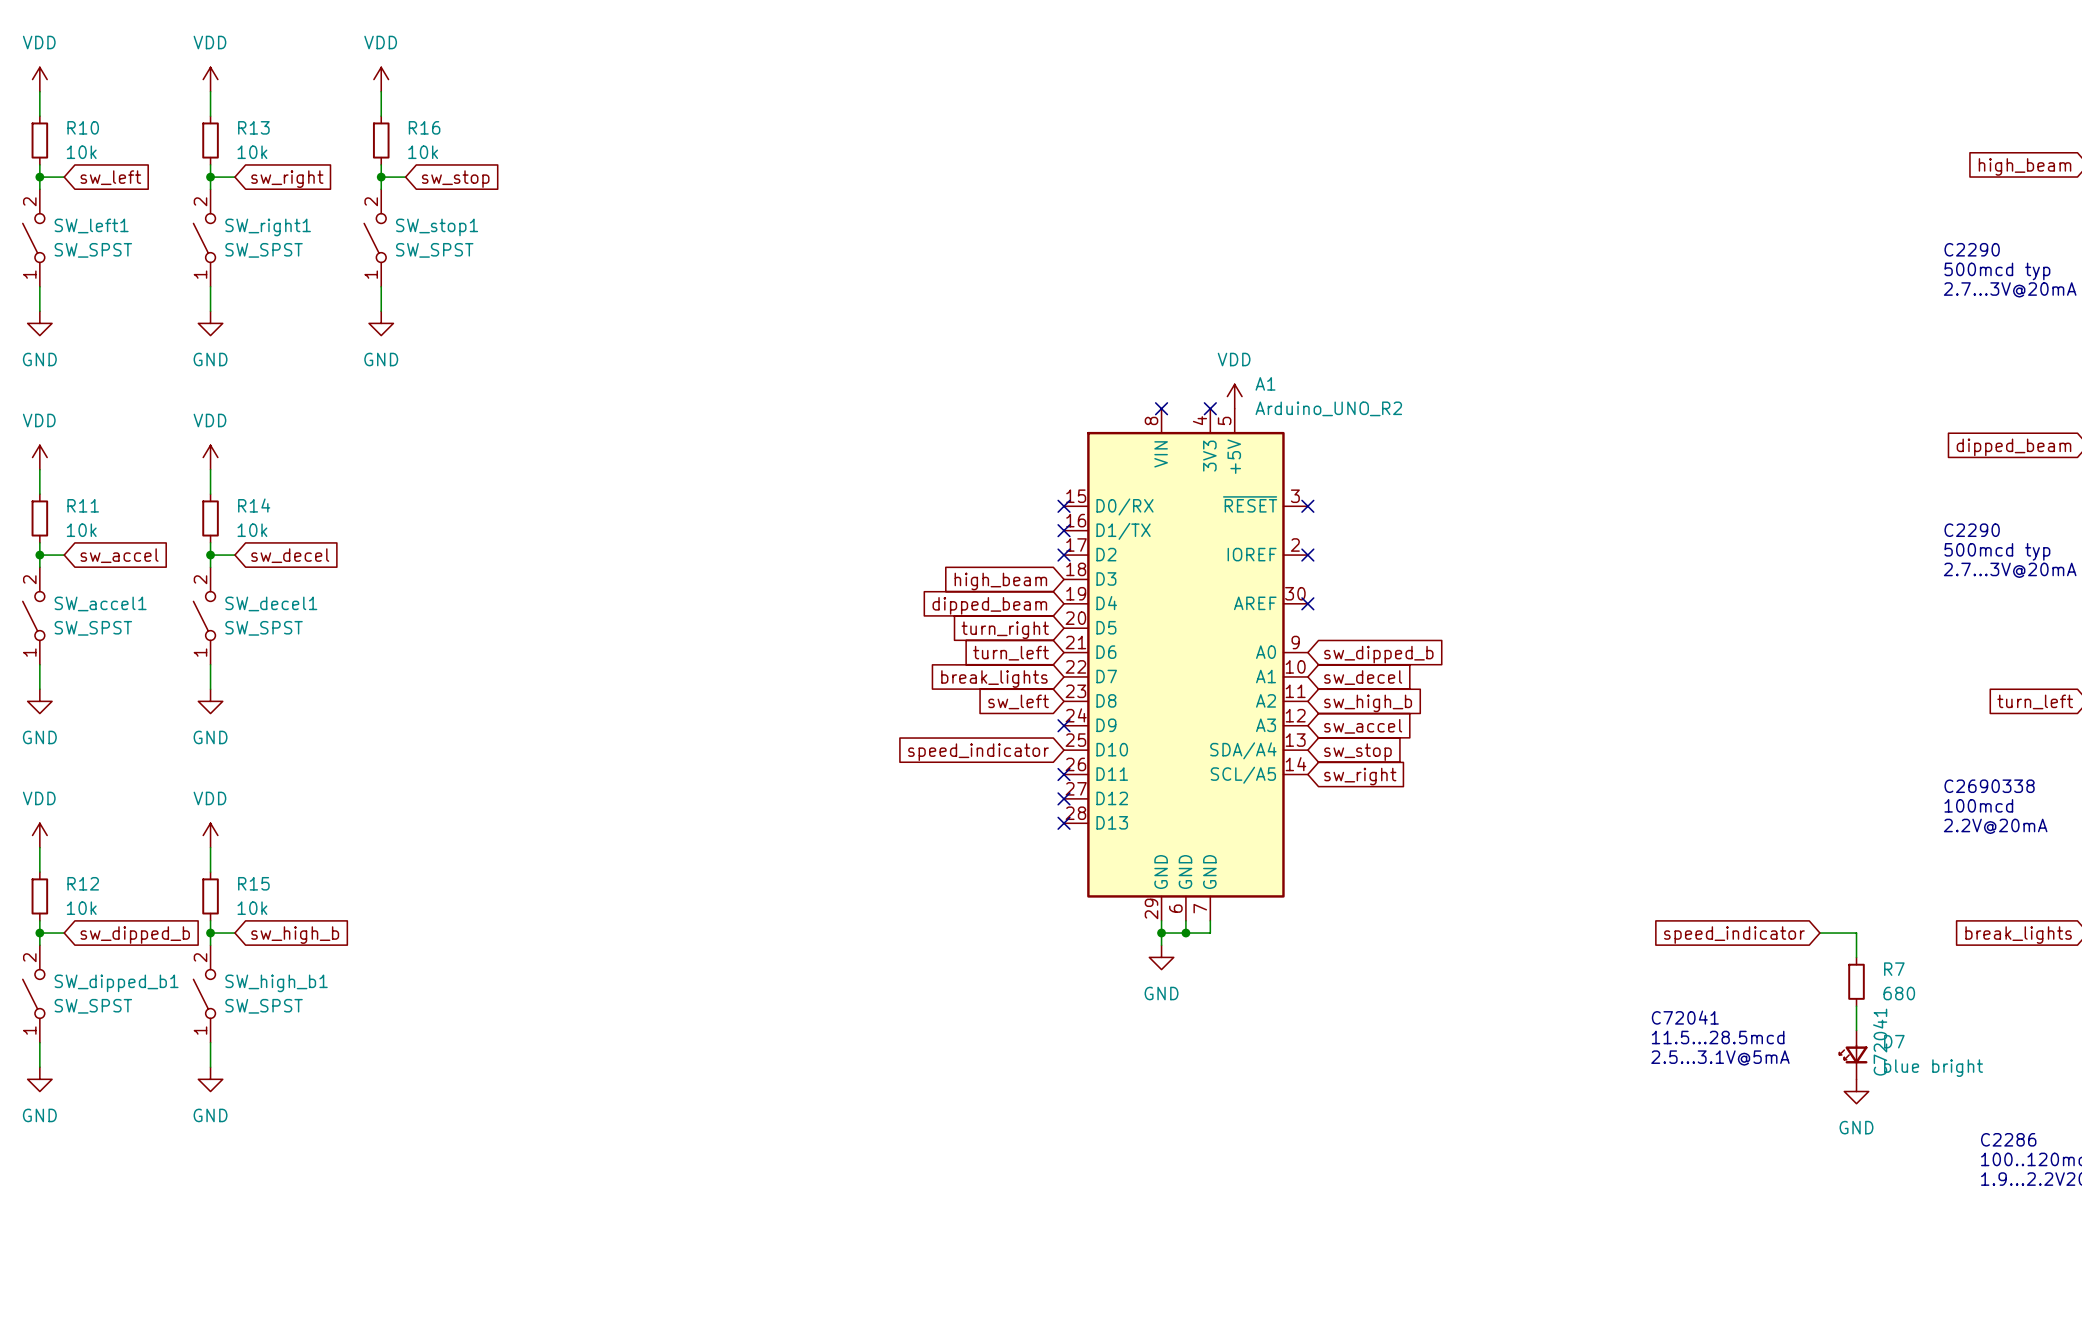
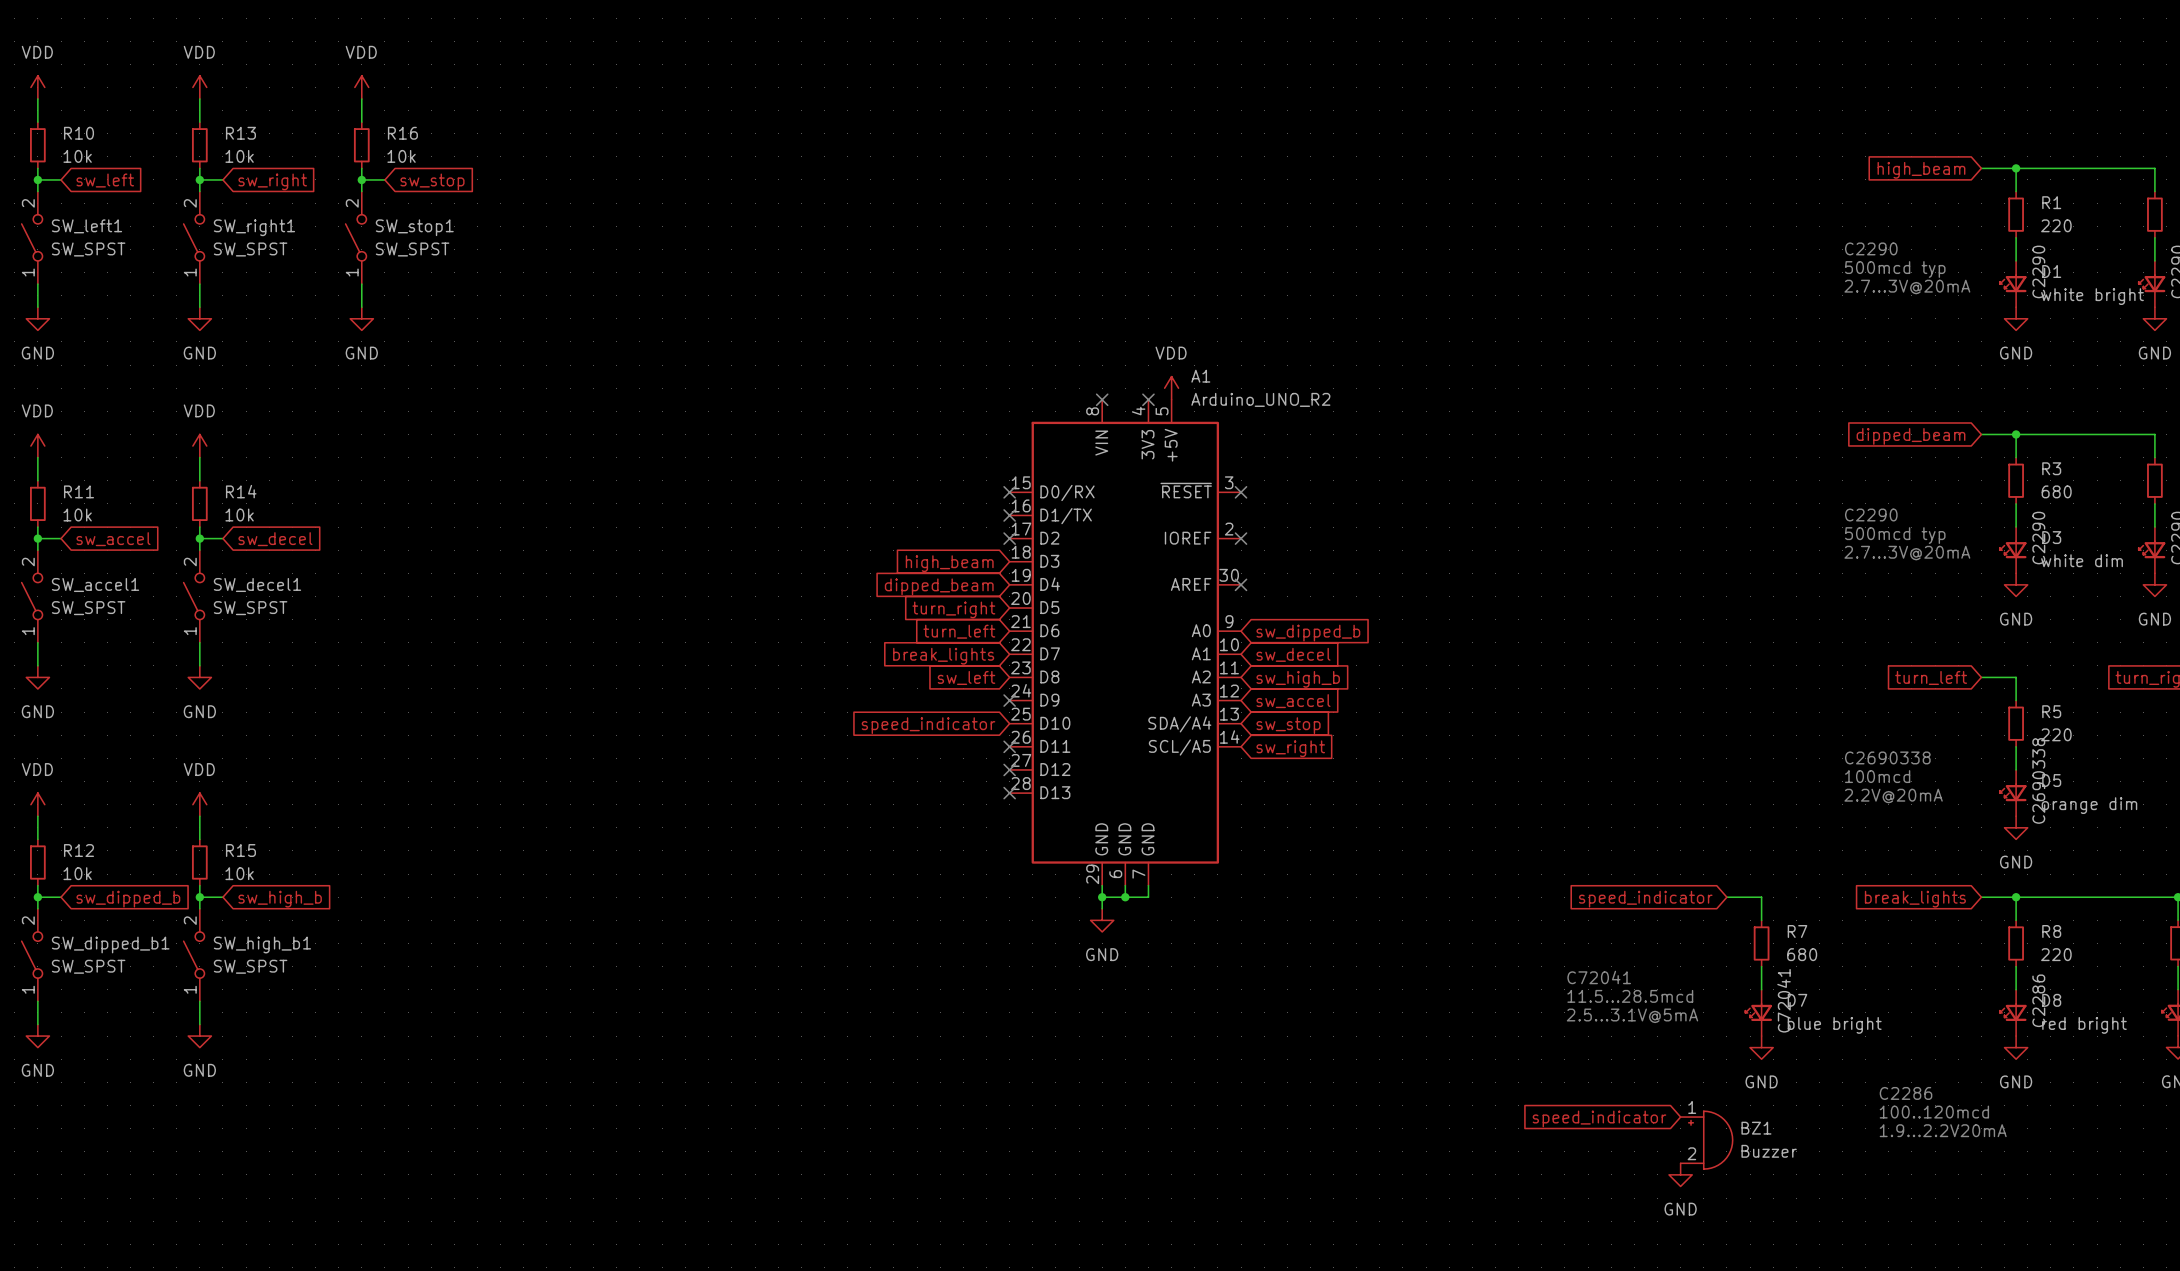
global label: none -> speed_indicator (1599, 1118)
BZ1: none -> Buzzer (1706, 1140)
power symbol: none -> GND (1680, 1174)

